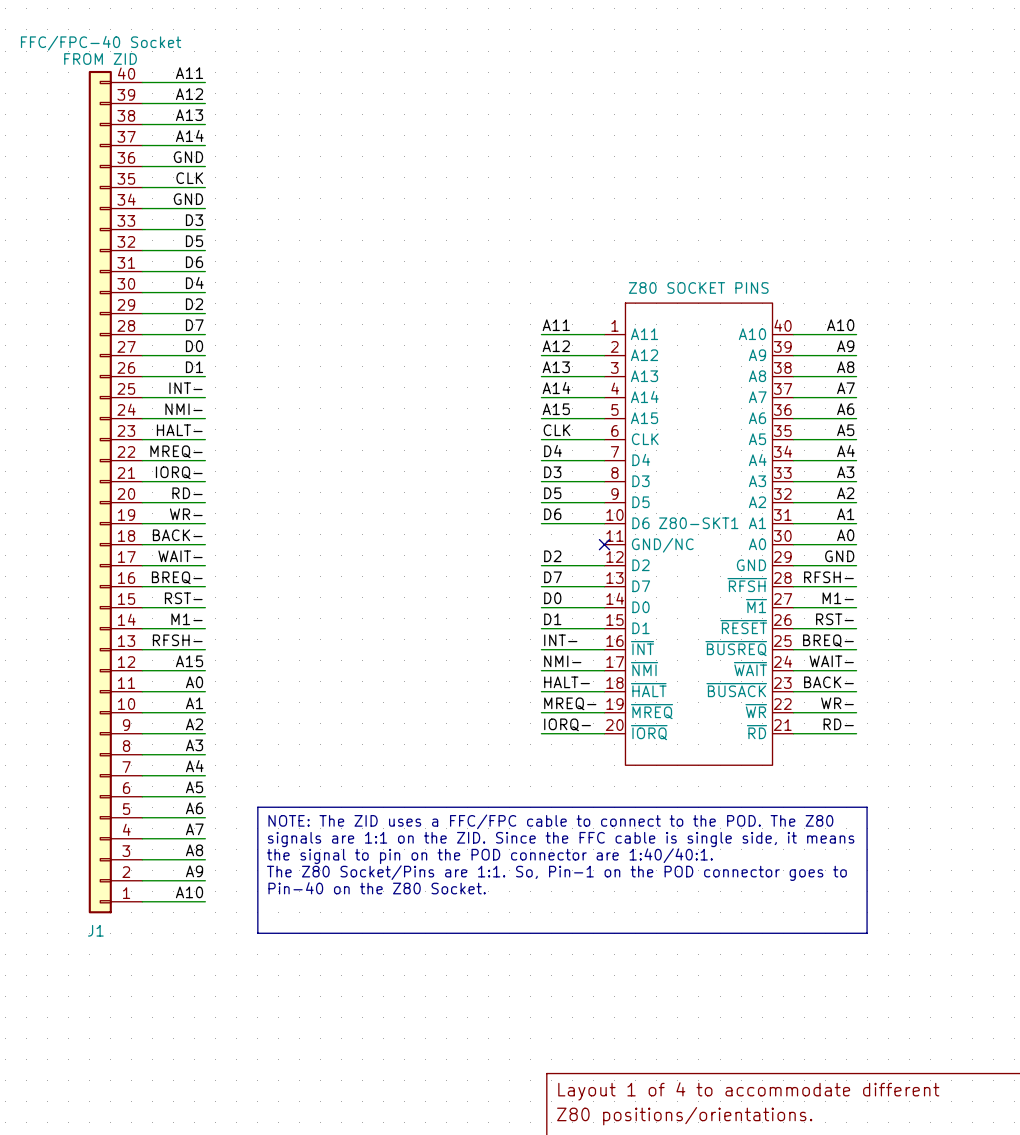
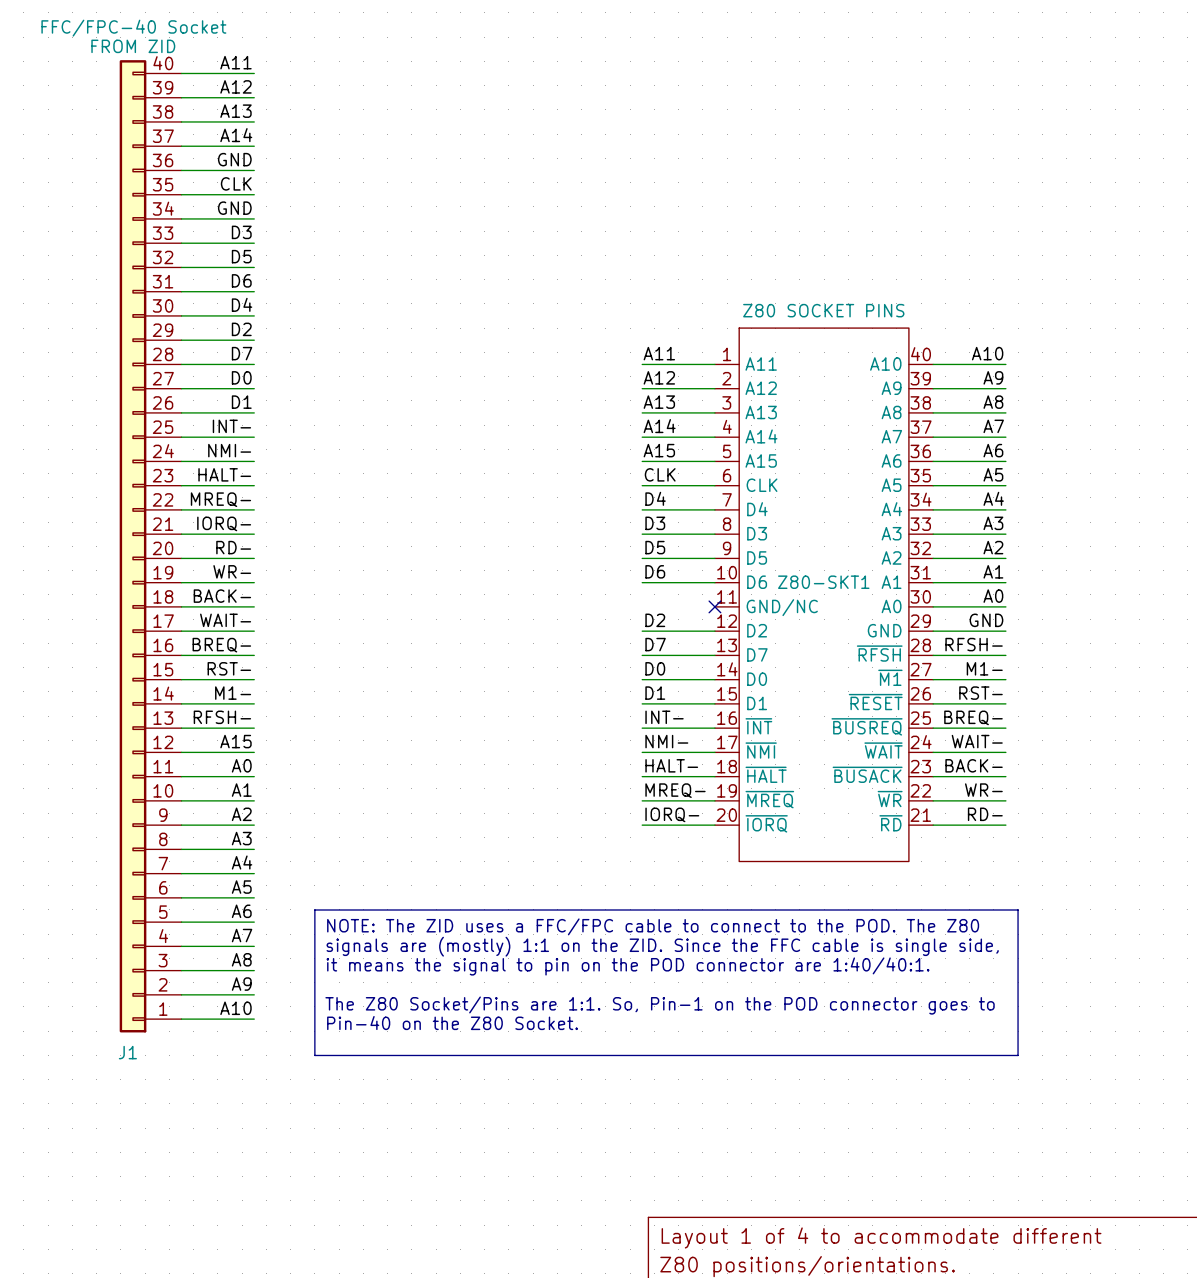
text: signals are 1:1 on the ZID. Since the FFC cable is single side, it means (561, 839) -> signals are (mostly) 1:1 on the ZID. Since the FFC cable is single side, (662, 946)
text: the signal to pin on the POD connector are 1:40/40:1. (489, 856) -> it means the signal to pin on the POD connector are 1:40/40:1. (628, 966)
text: The Z80 Socket/Pins are 1:1. So, Pin-1 on the POD connector goes to (556, 873) -> none
text: Pin-40 on the Z80 Socket. (377, 888) -> The Z80 Socket/Pins are 1:1. So, Pin-1 on the POD connector goes to (660, 1005)
text: none -> Pin-40 on the Z80 Socket. (452, 1023)

